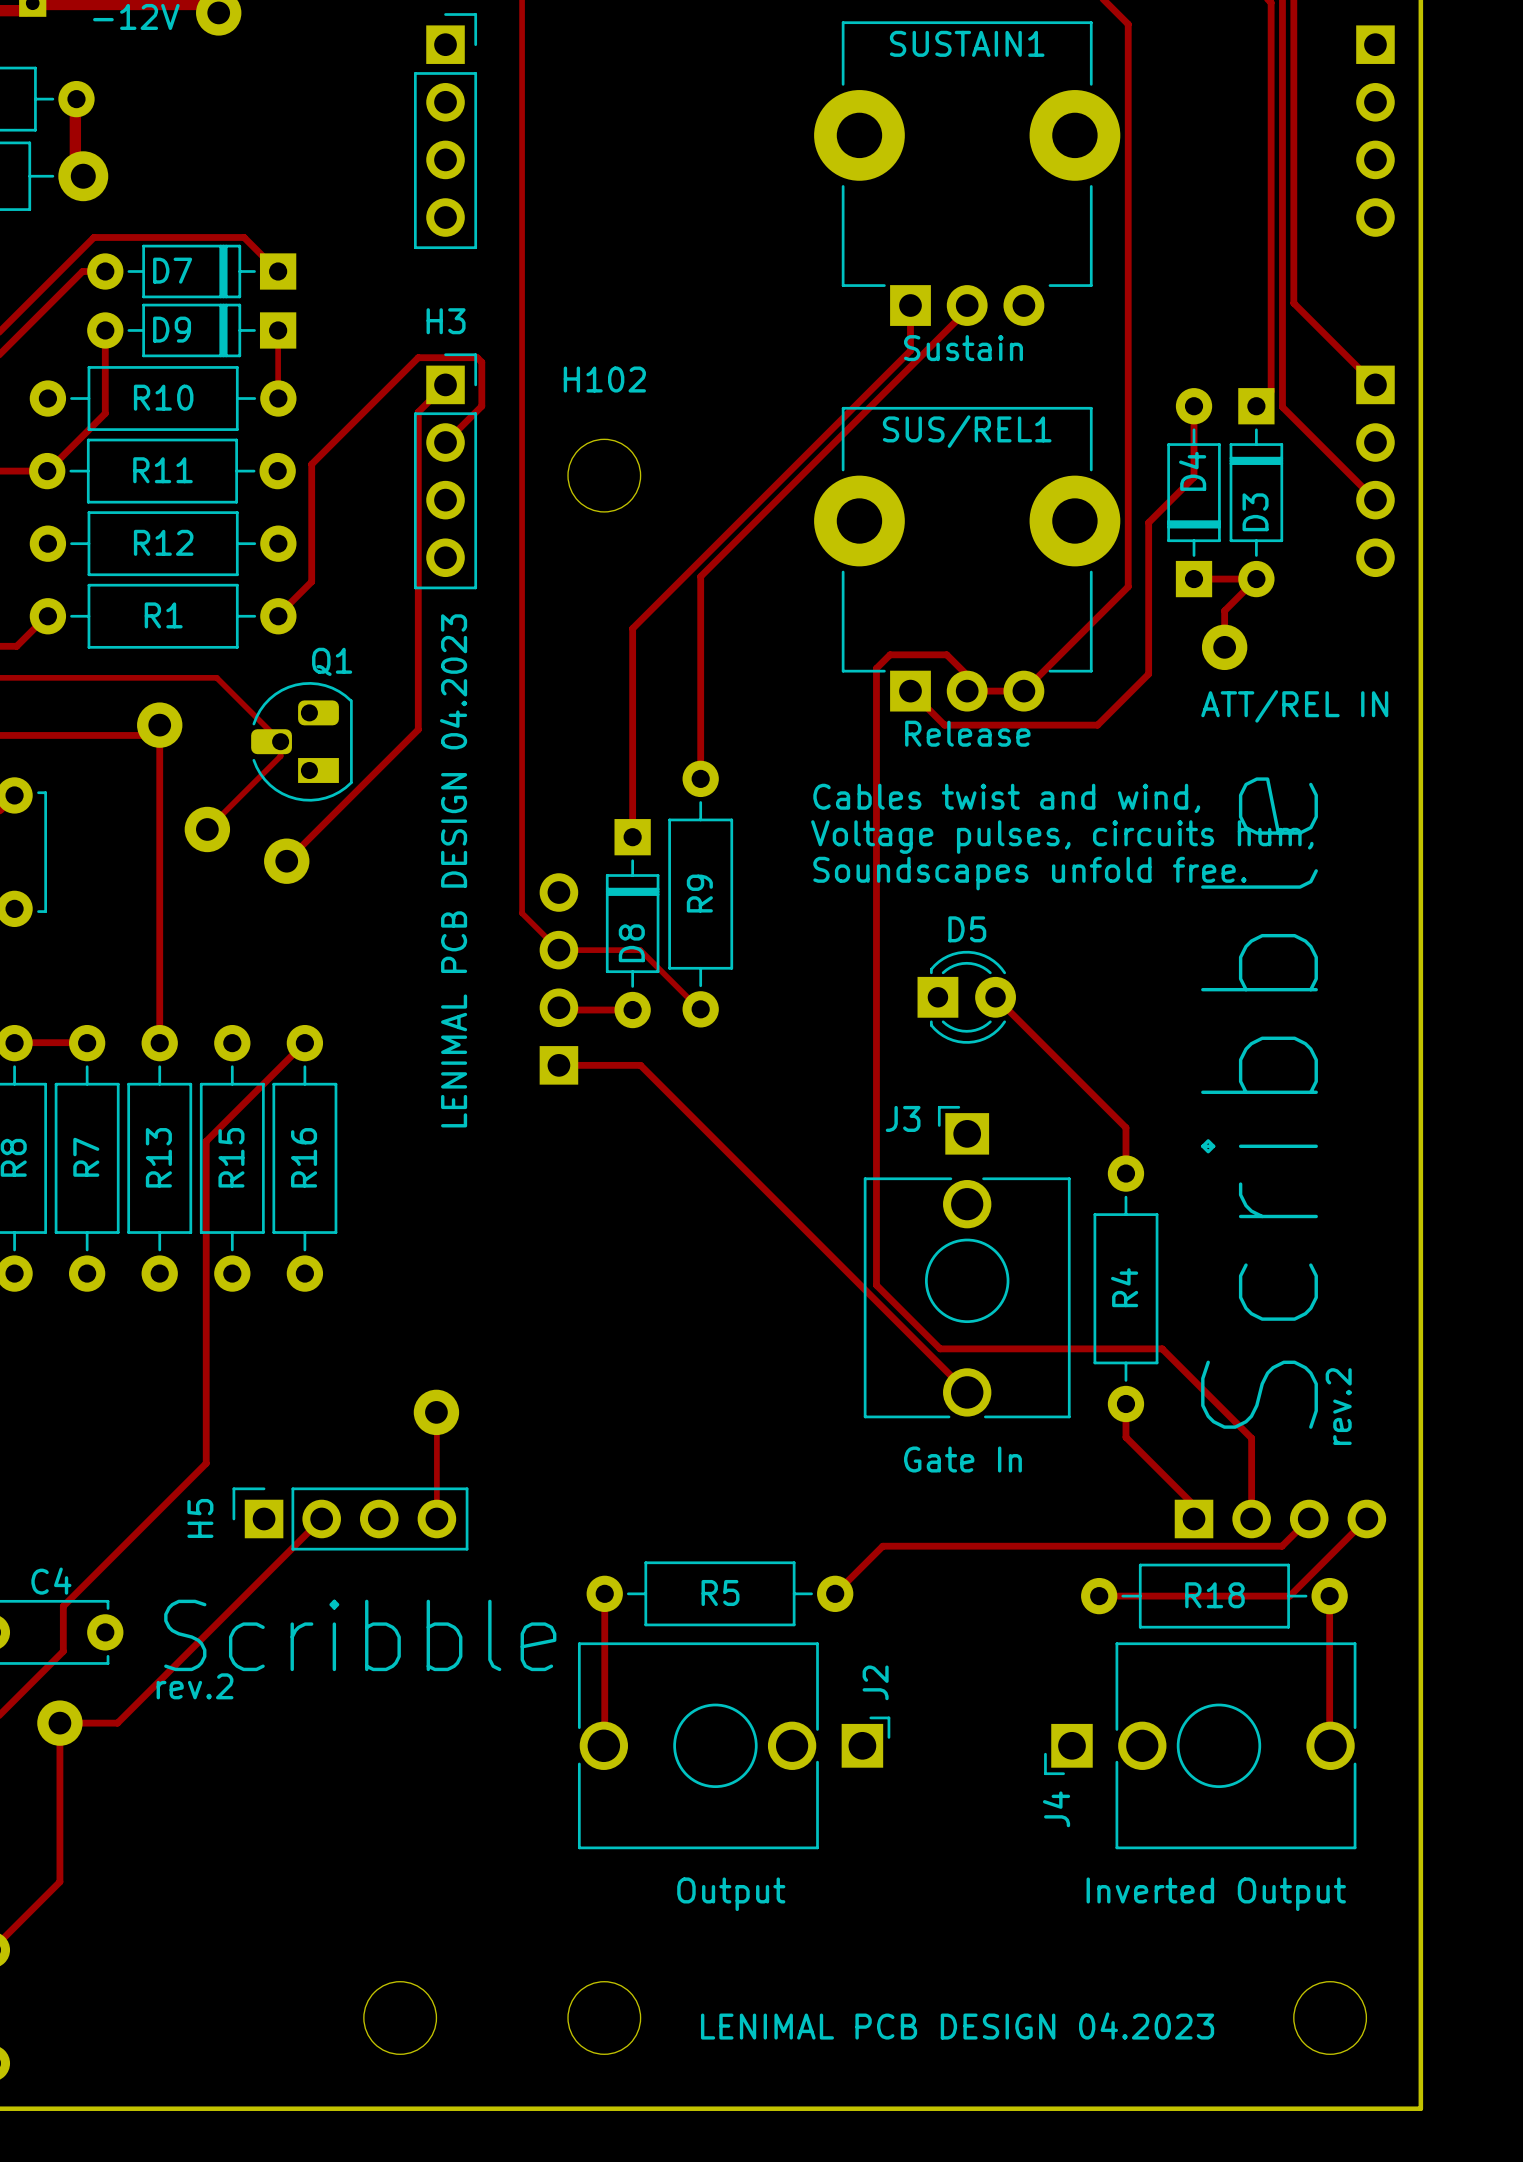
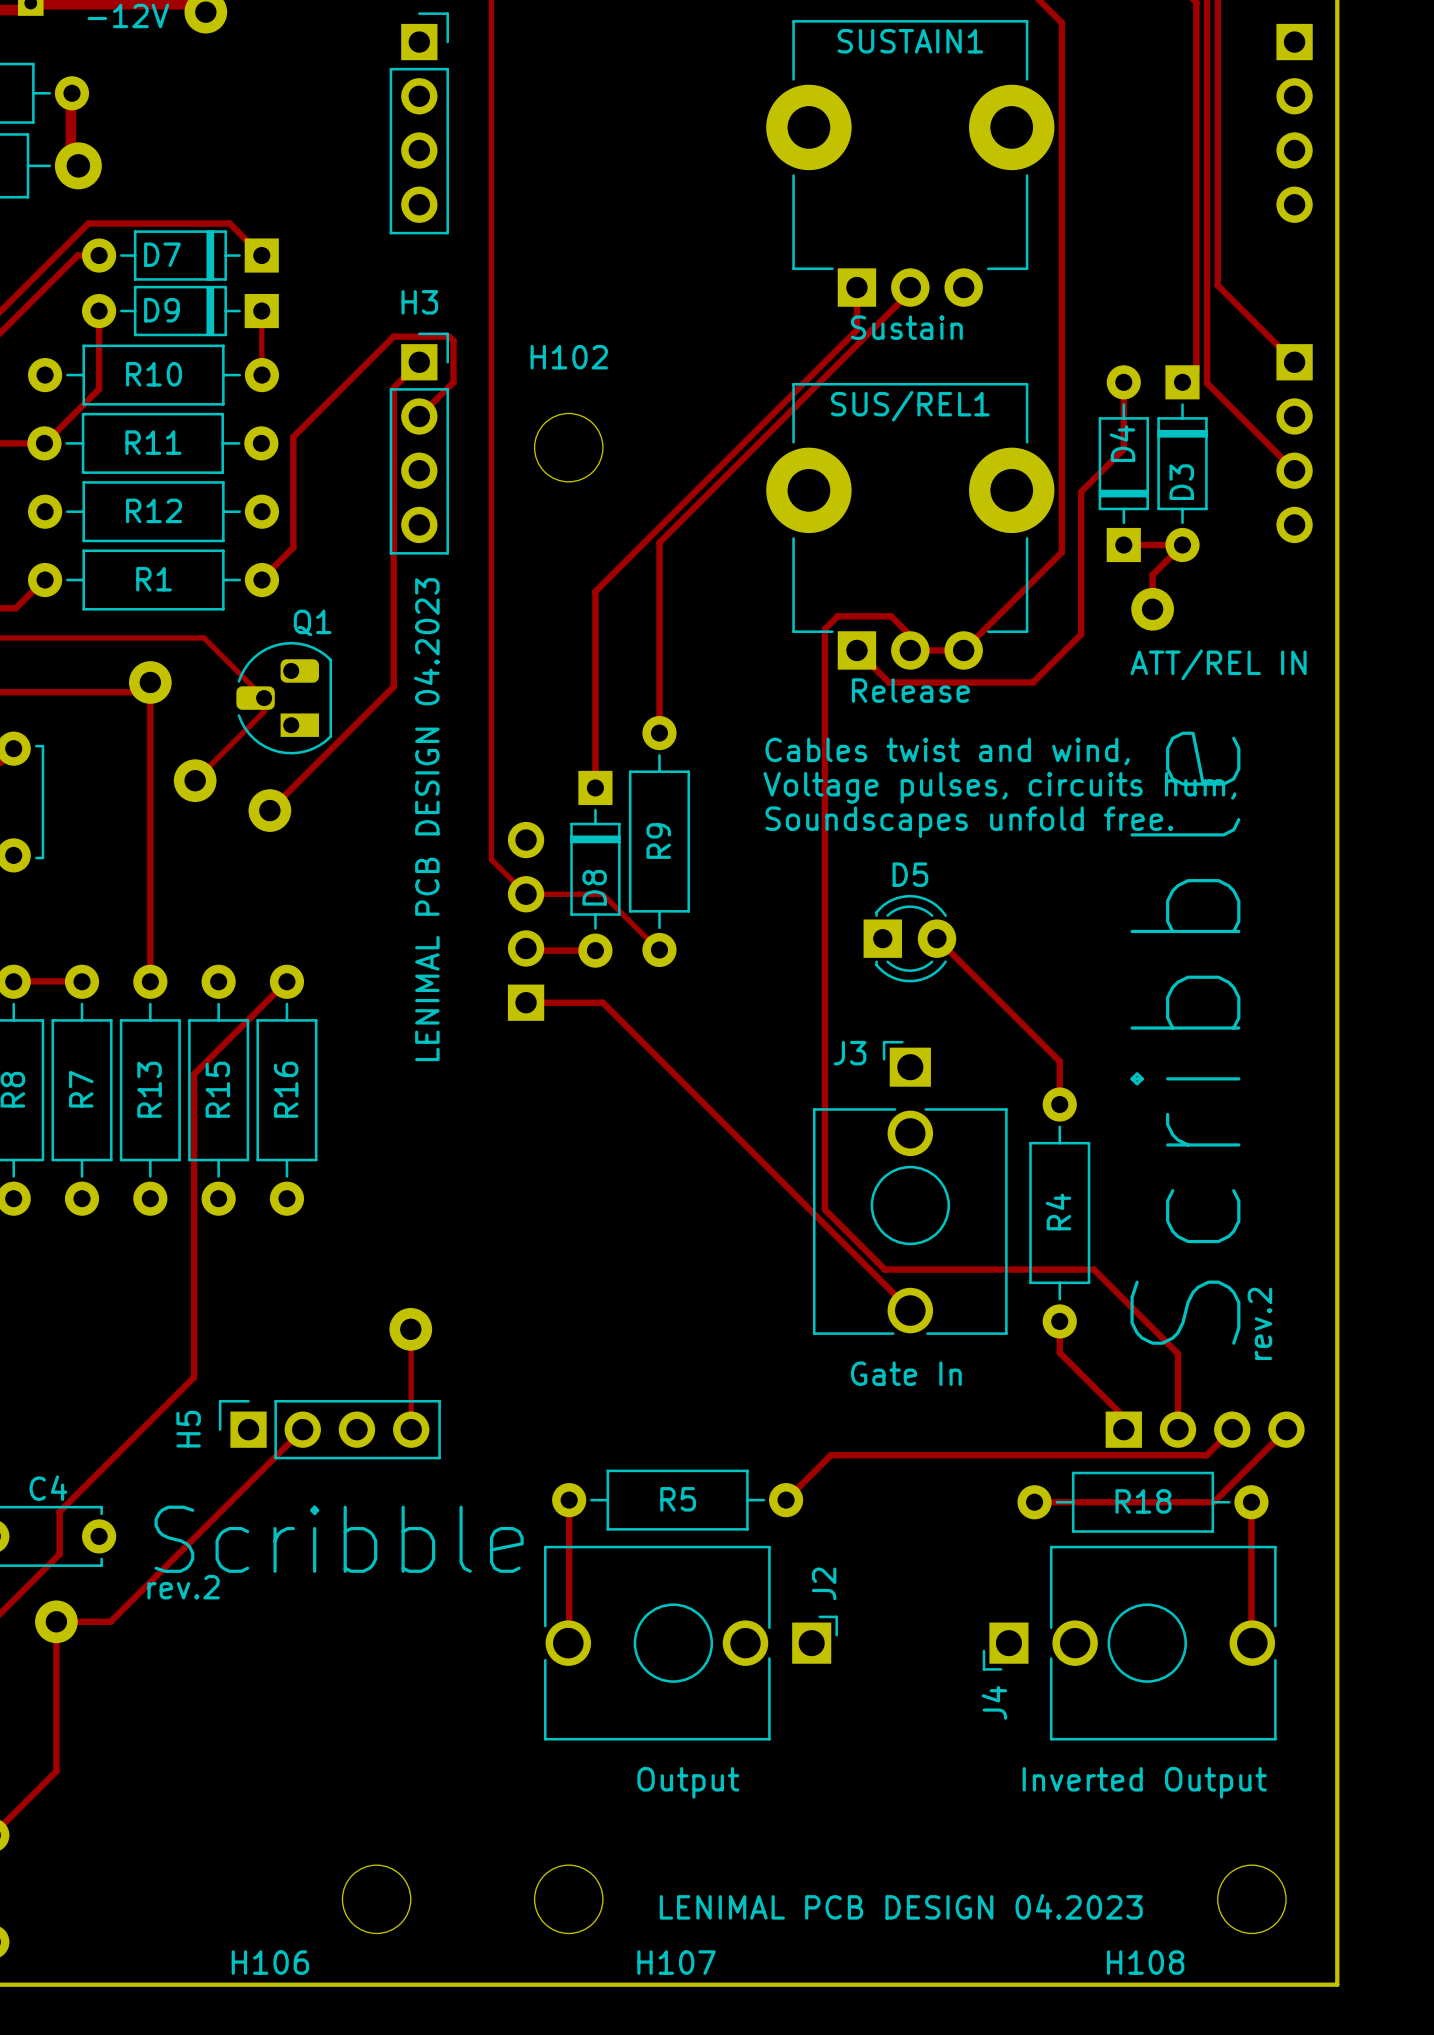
H106 name: none -> H106 (270, 1962)
H107 name: none -> H107 (676, 1962)
H108 name: none -> H108 (1145, 1962)

